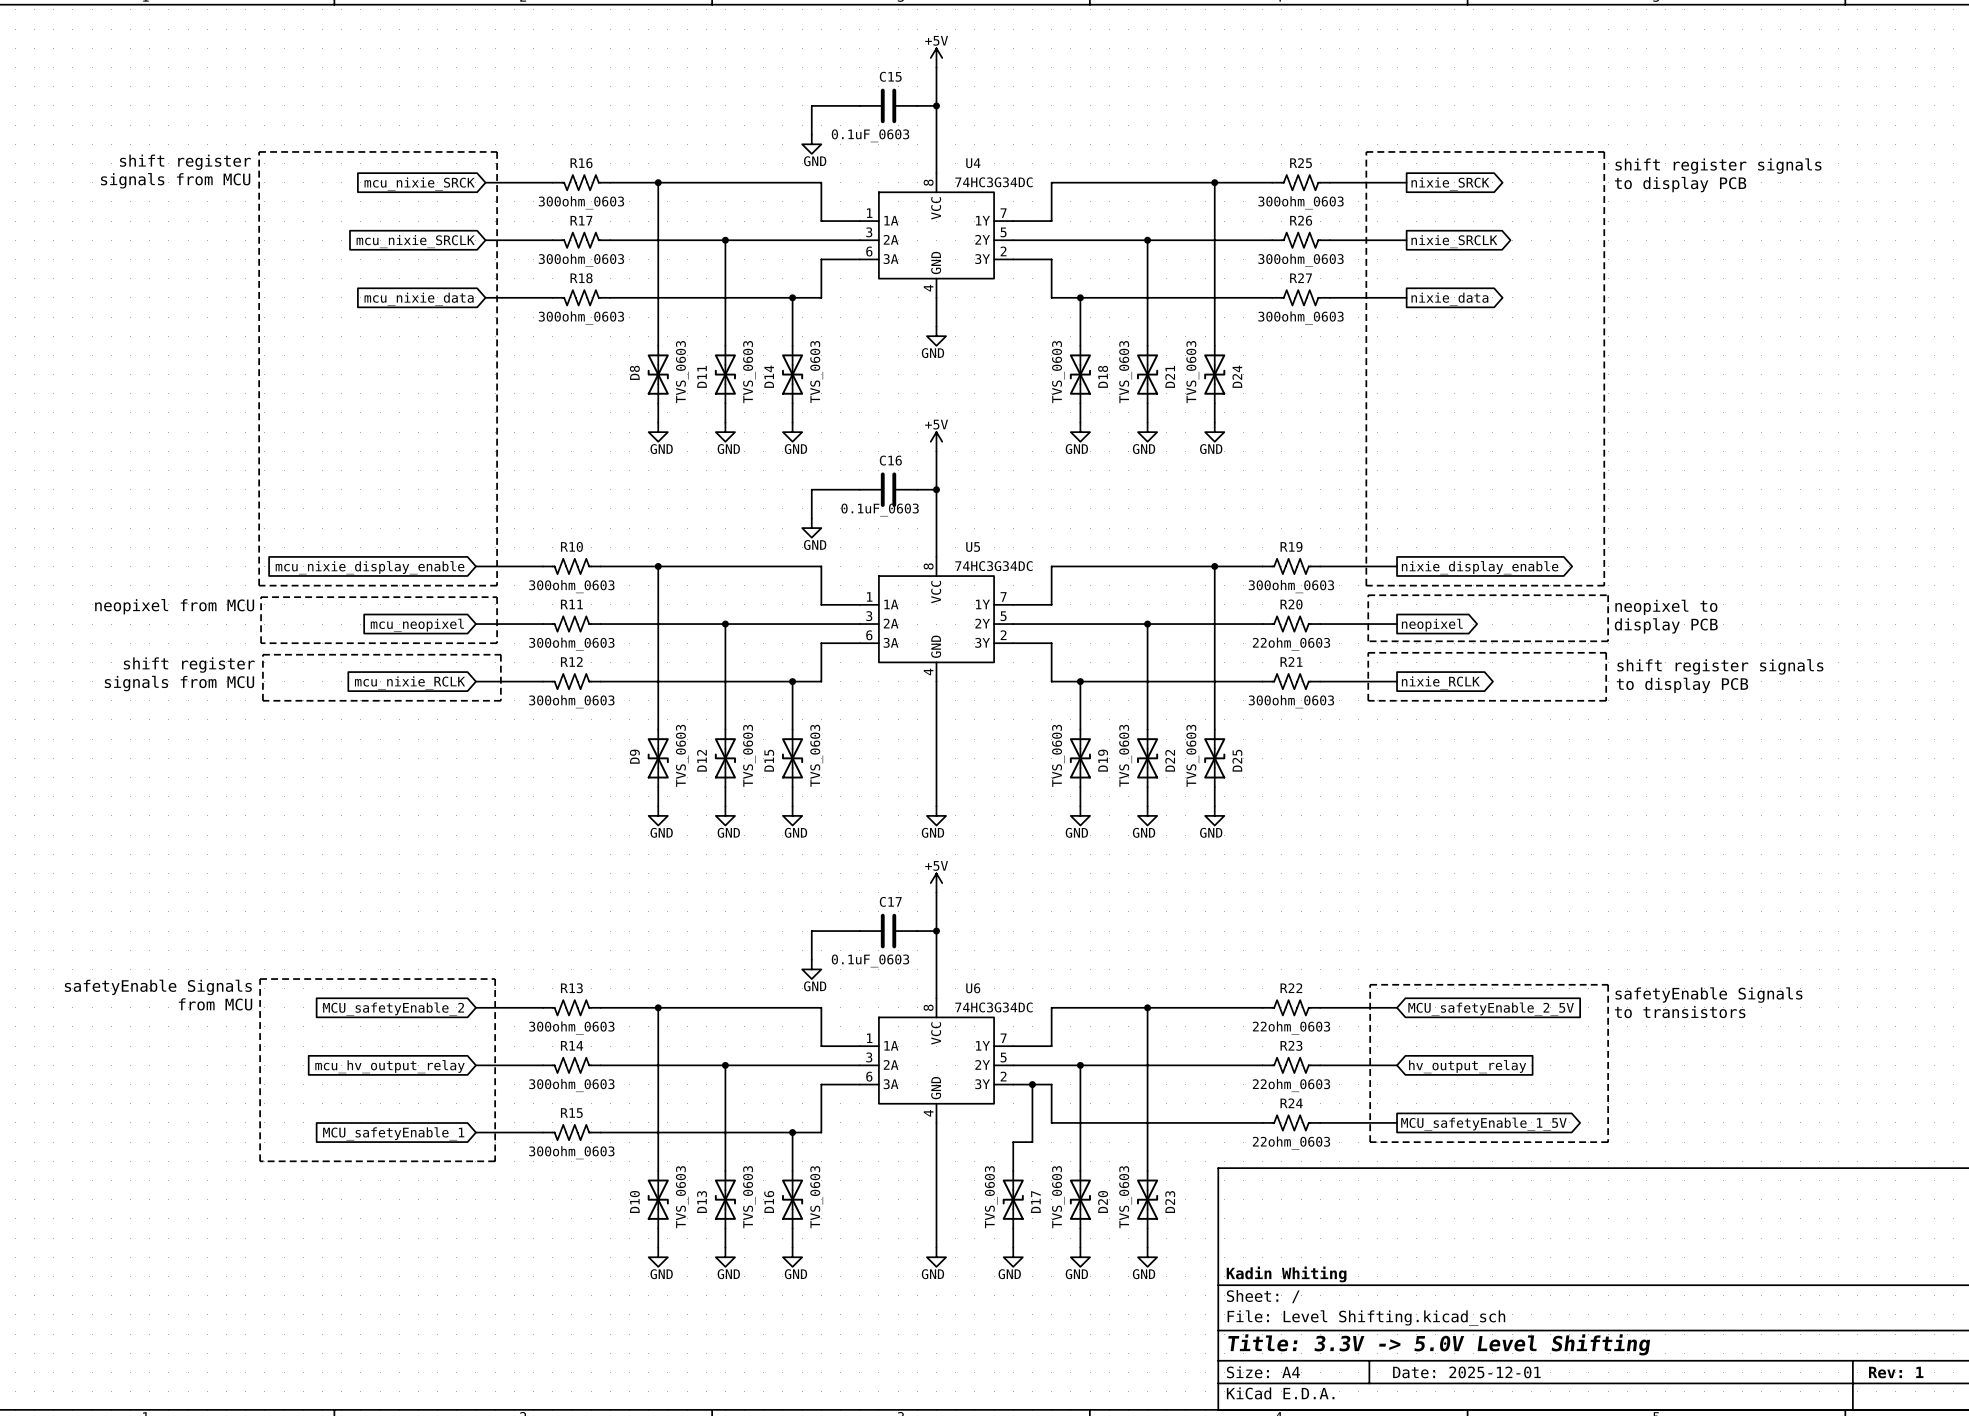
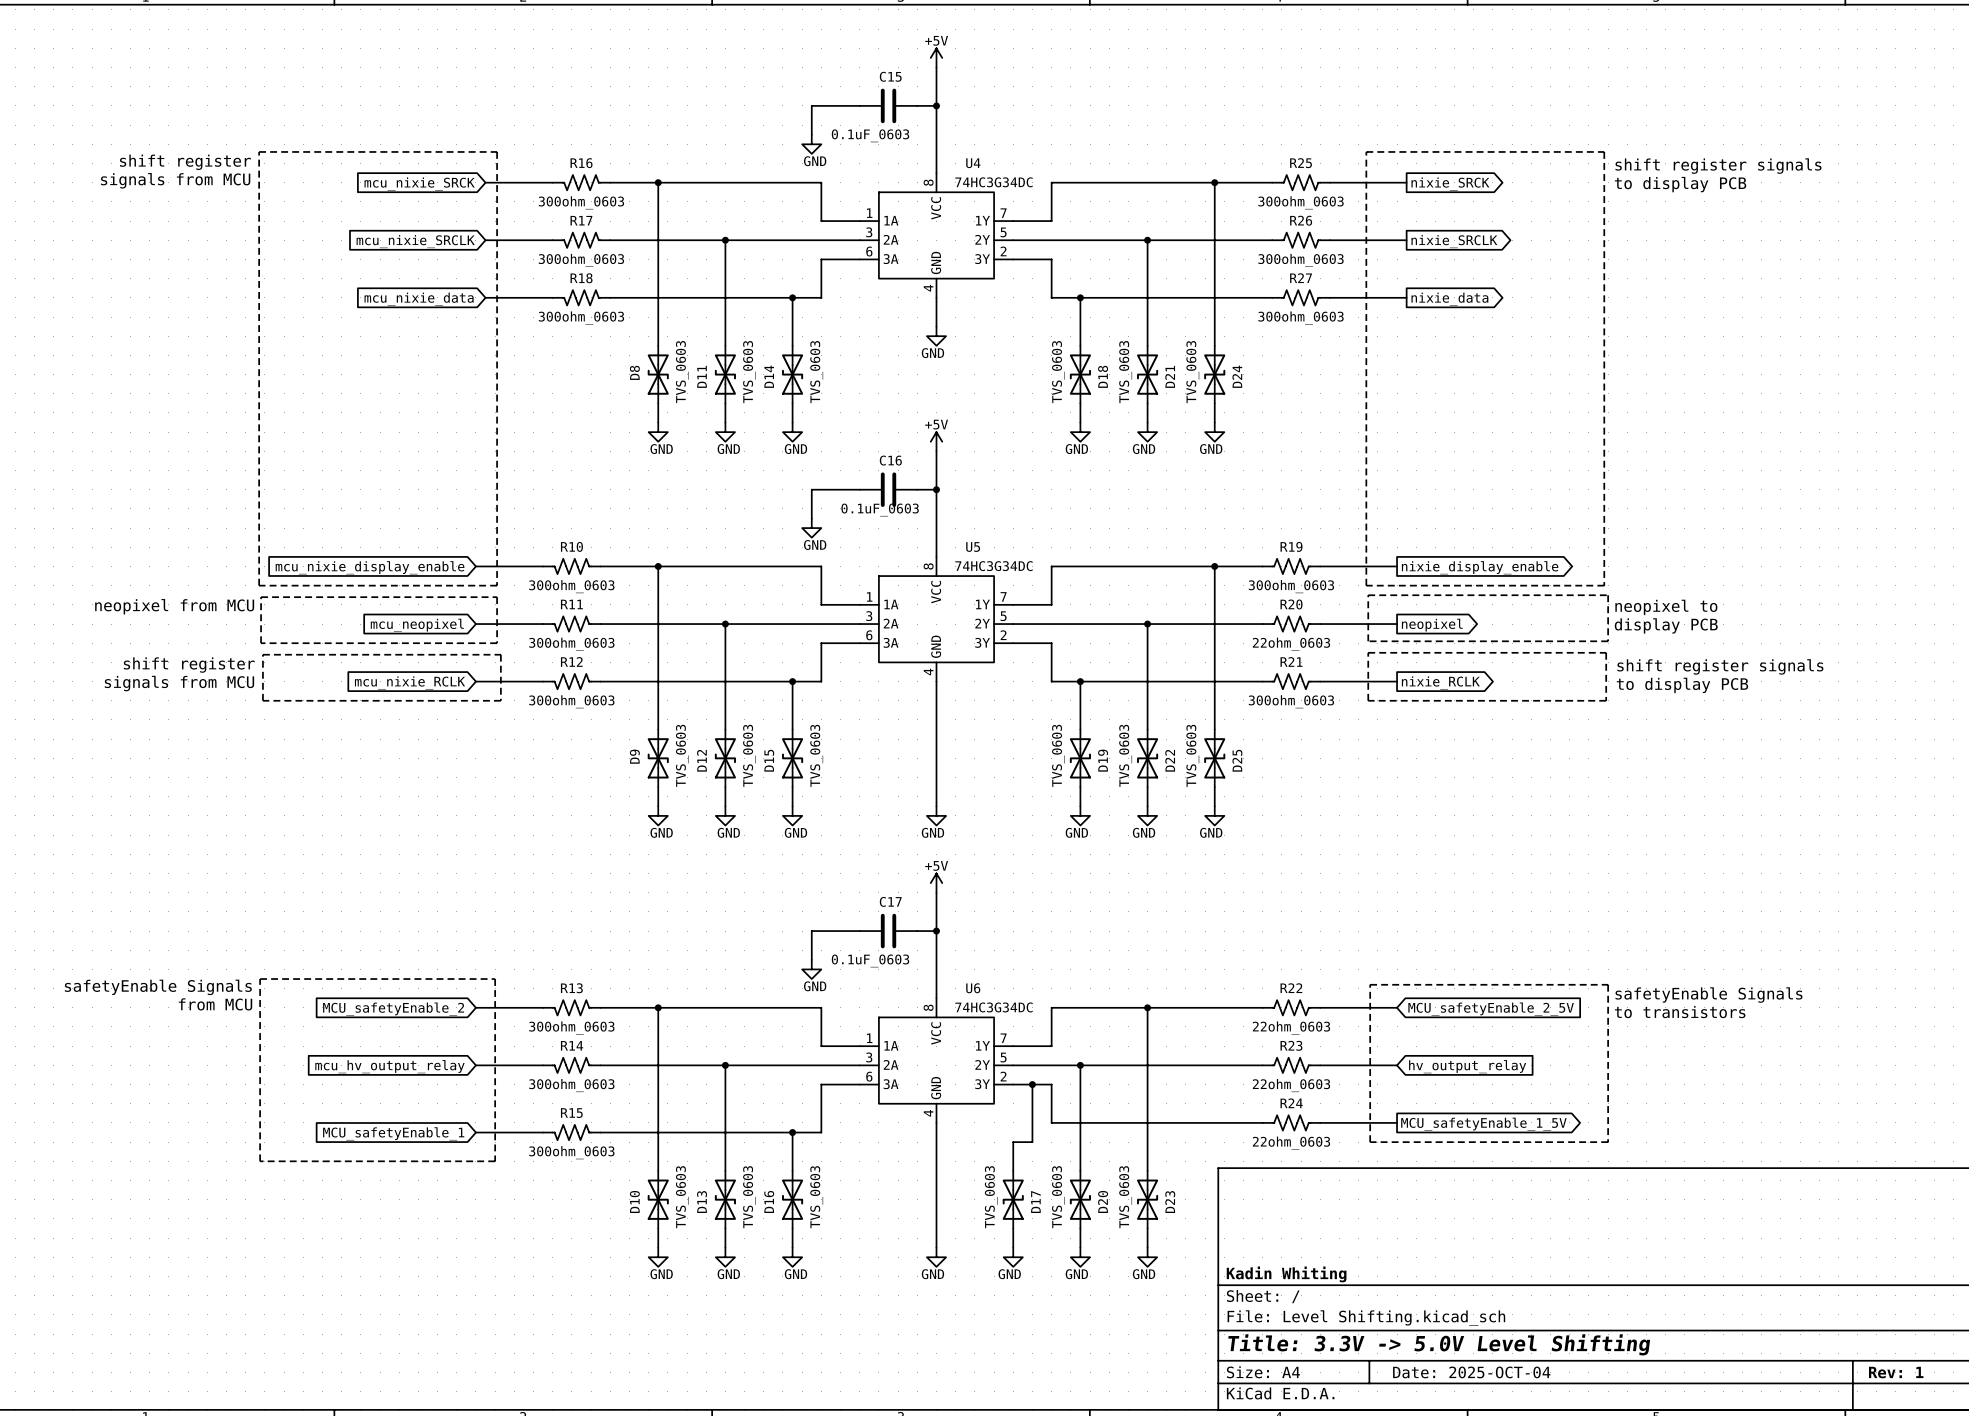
title block: Date: 2025-12-01 (1466, 1372) -> Date: 2025-OCT-04 (1471, 1372)

